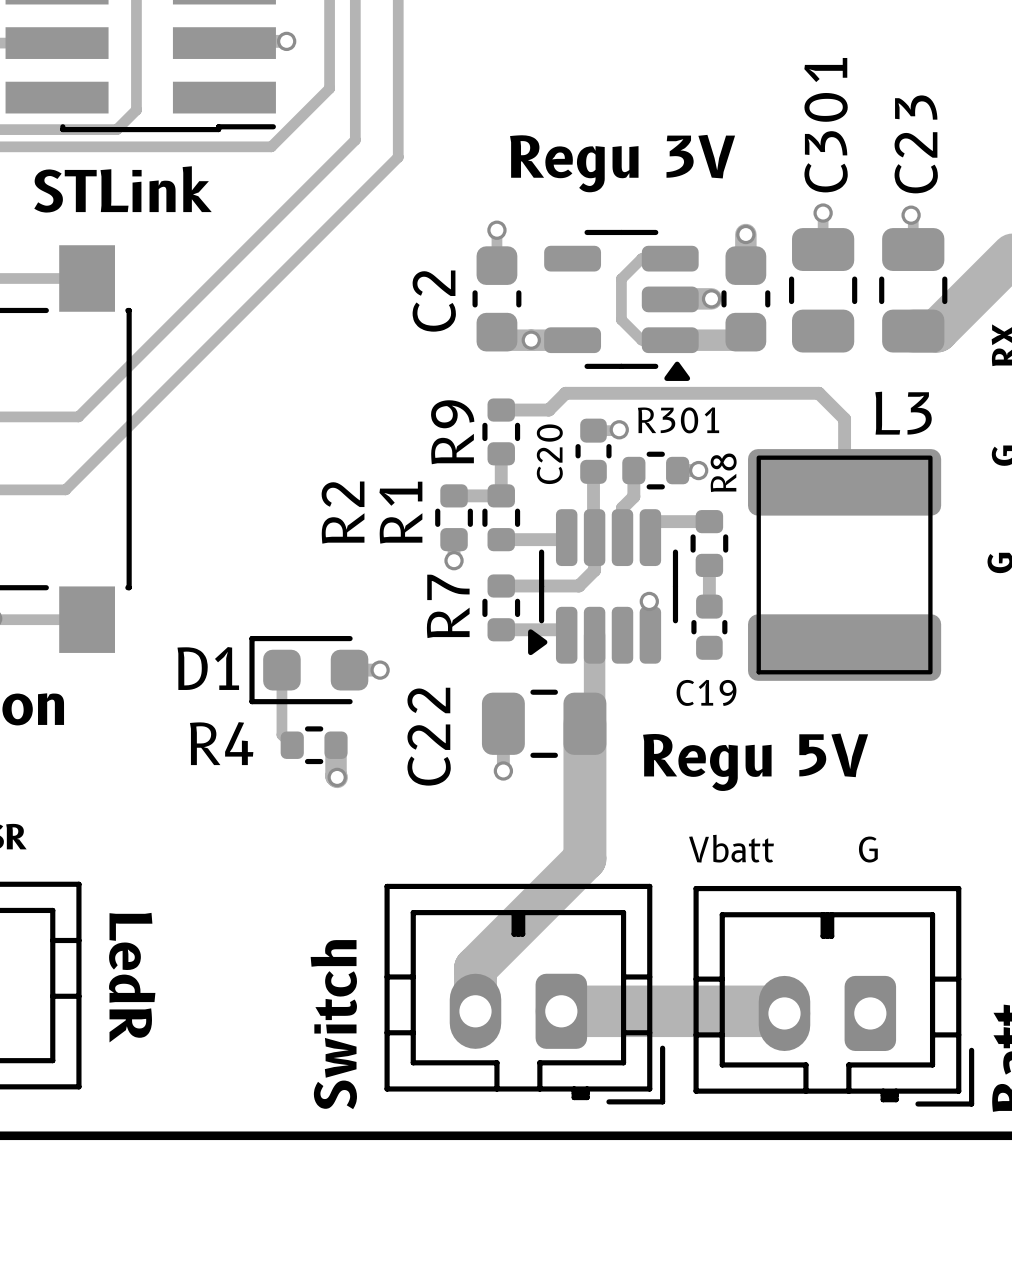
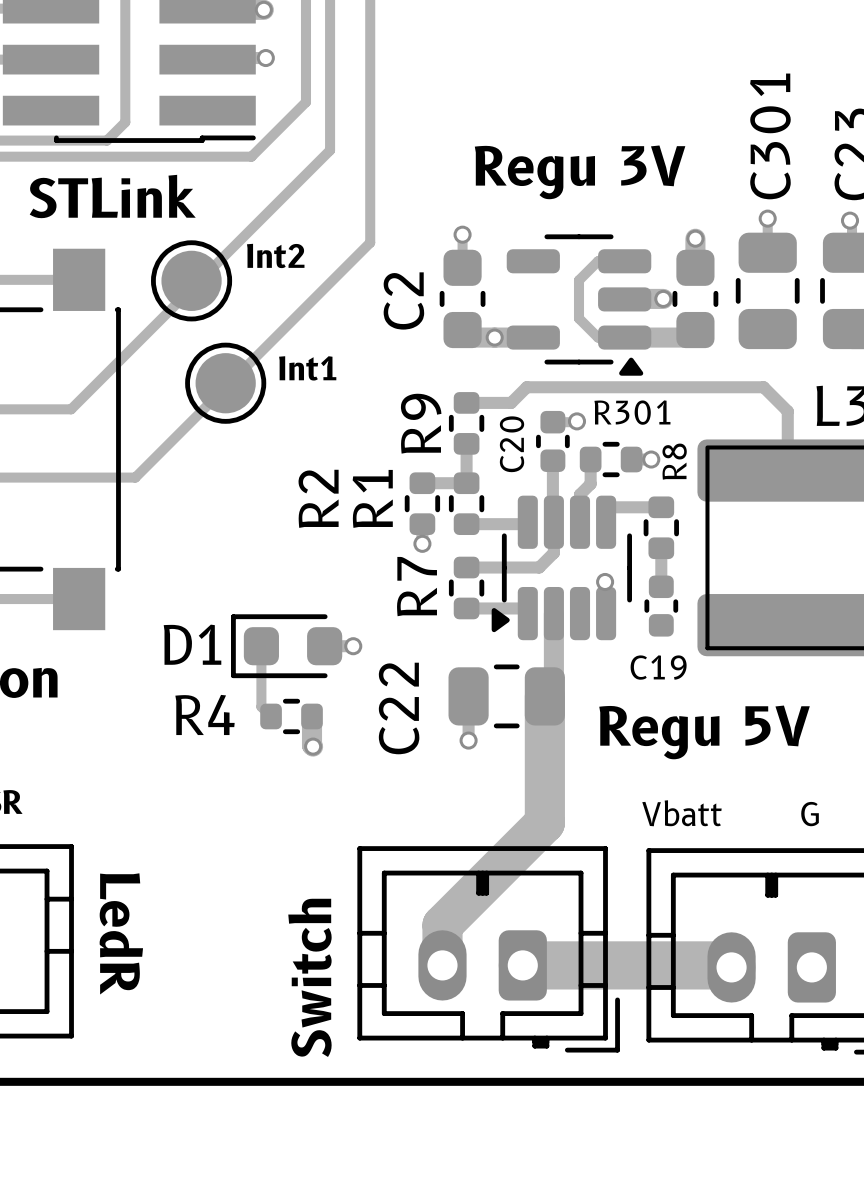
track: (398, 157) (65, 489) -> (370, 166) (370, 242) (135, 477) (59, 477)
text: none -> Int2 (275, 255)
part: none -> (191, 280)
text: none -> Int1 (307, 368)
part: none -> (225, 383)

